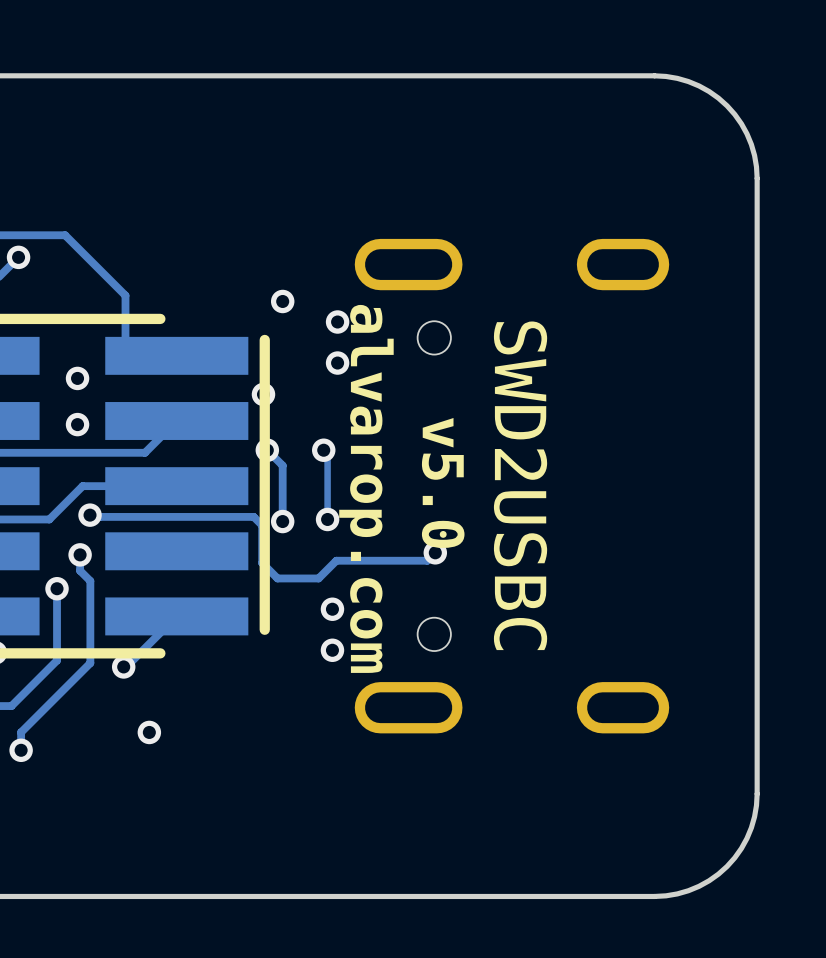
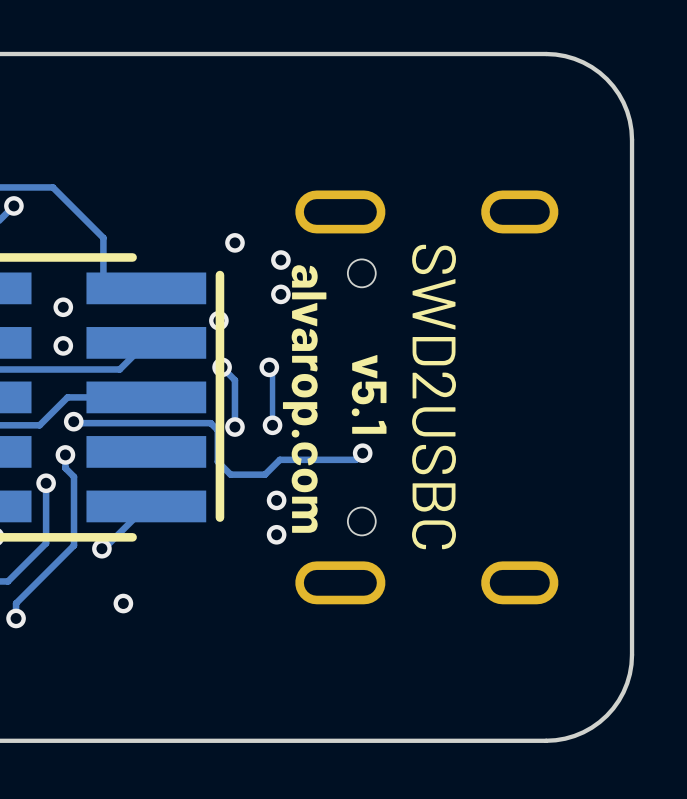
text: v5.0 (443, 482) -> v5.1 (369, 394)

